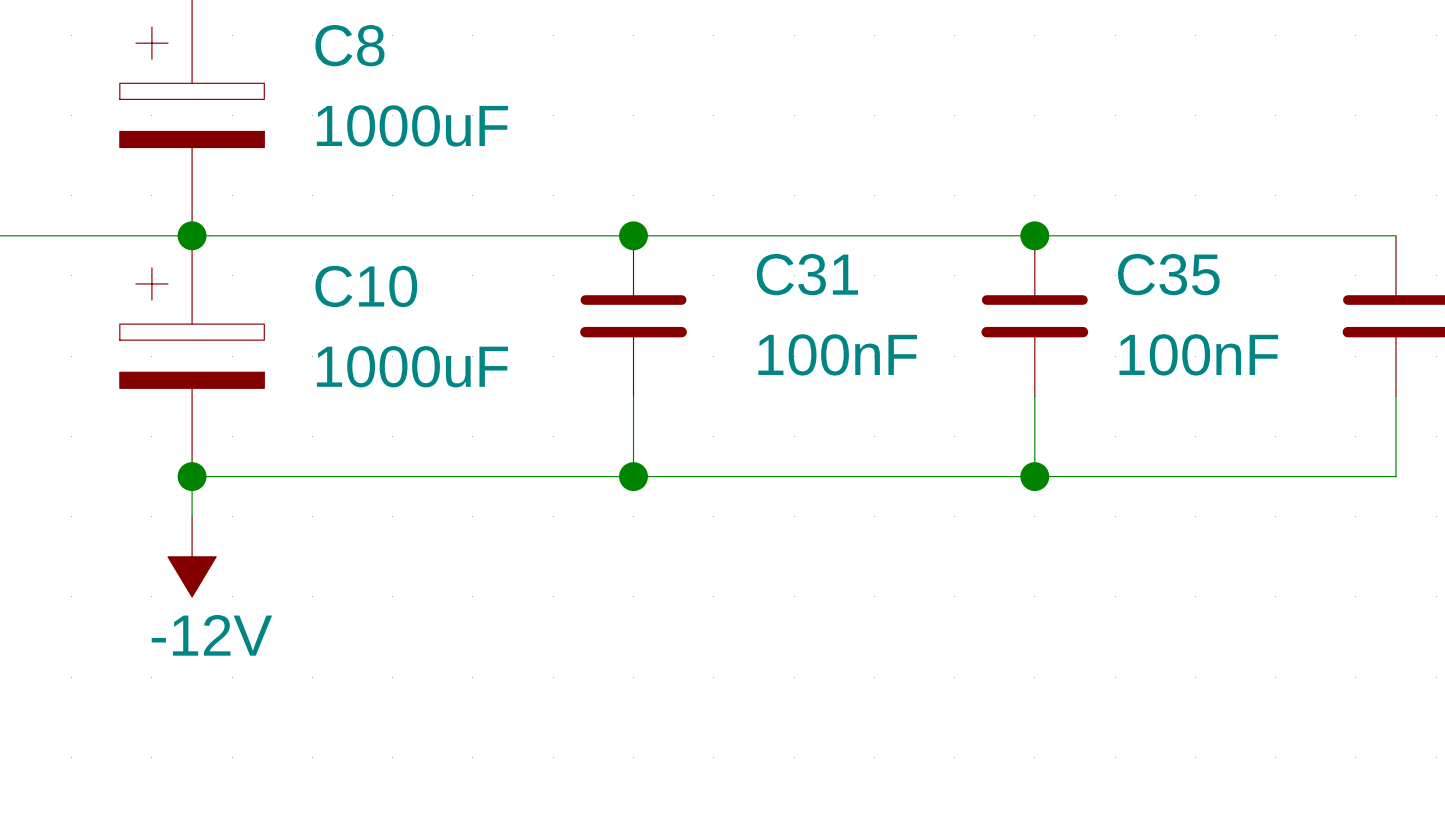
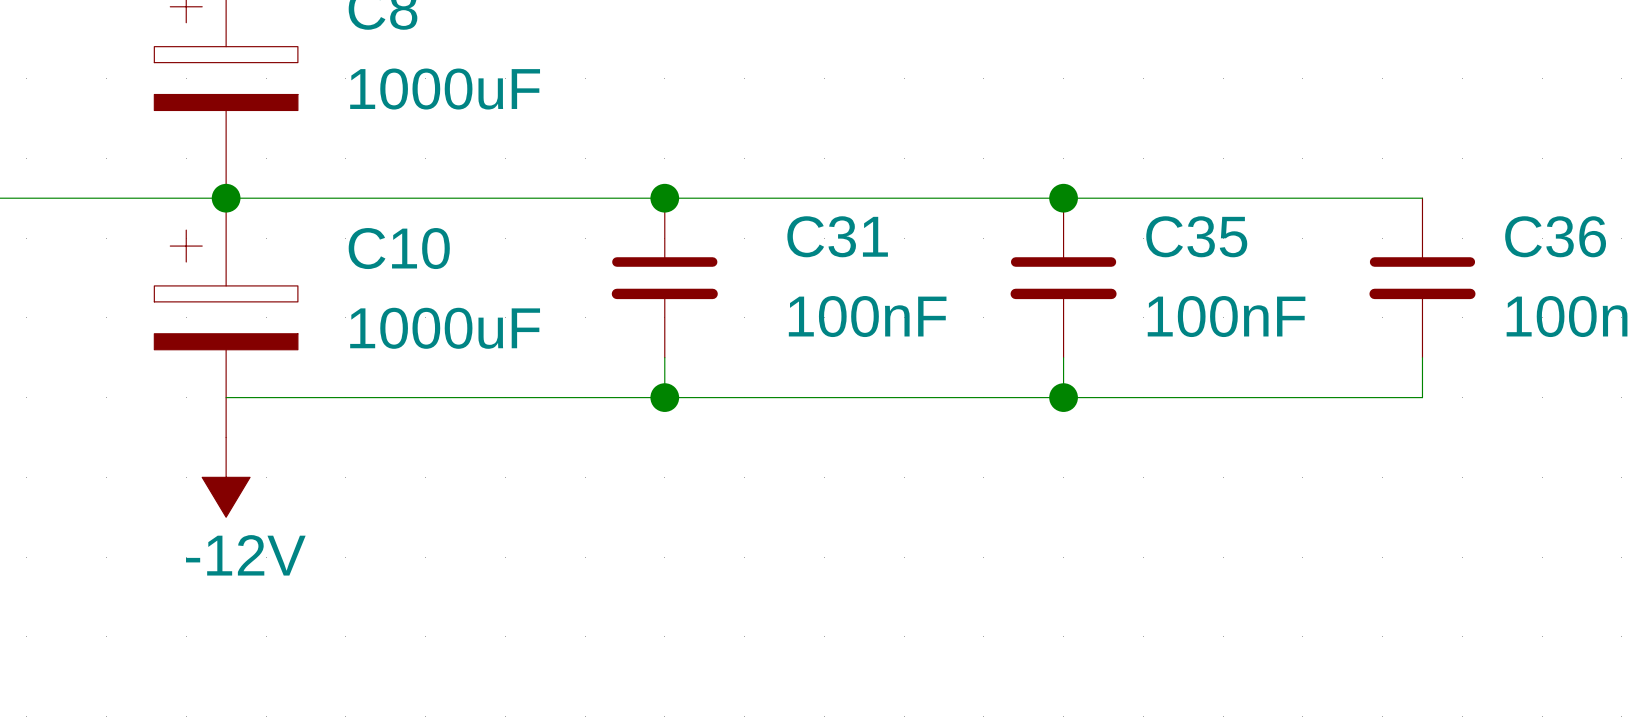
wire: (633, 436) (633, 476) -> none
wire: (1034, 436) (1034, 476) -> none
wire: (1395, 436) (1395, 476) (192, 476) (192, 516) -> (1422, 397) (226, 397)
junction: (192, 476) -> none
junction position: (633, 476) -> (664, 397)
junction position: (1034, 476) -> (1063, 397)
power symbol position: -12V (192, 556) -> -12V (226, 477)

